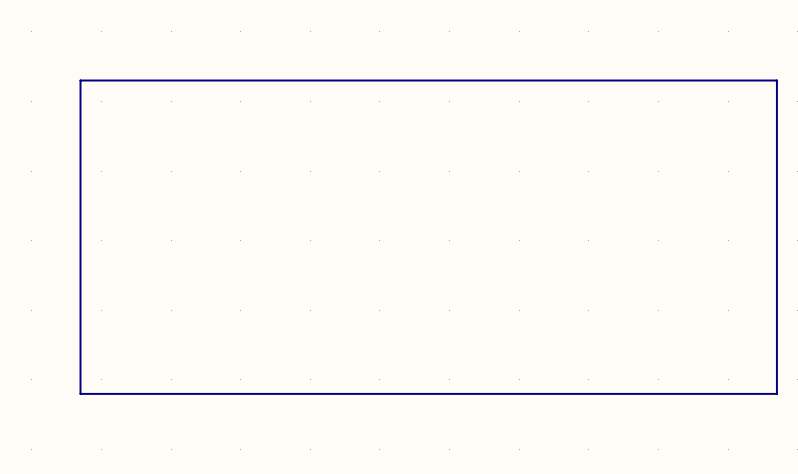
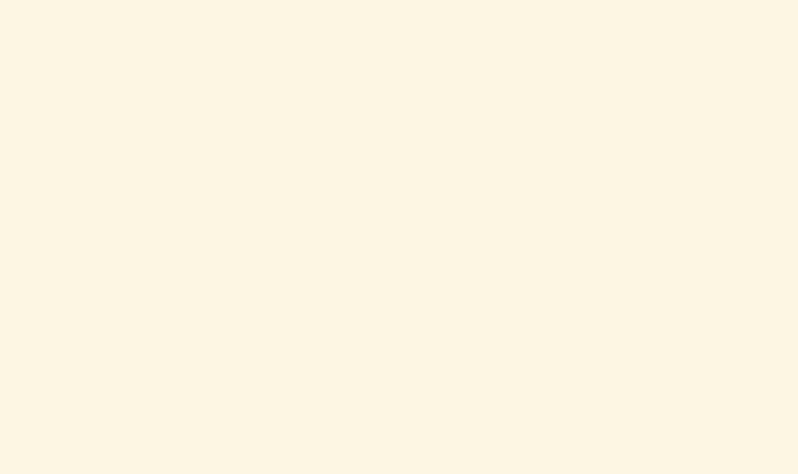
line: (80, 80) (776, 80) (776, 393) (80, 393) (80, 80) -> none

